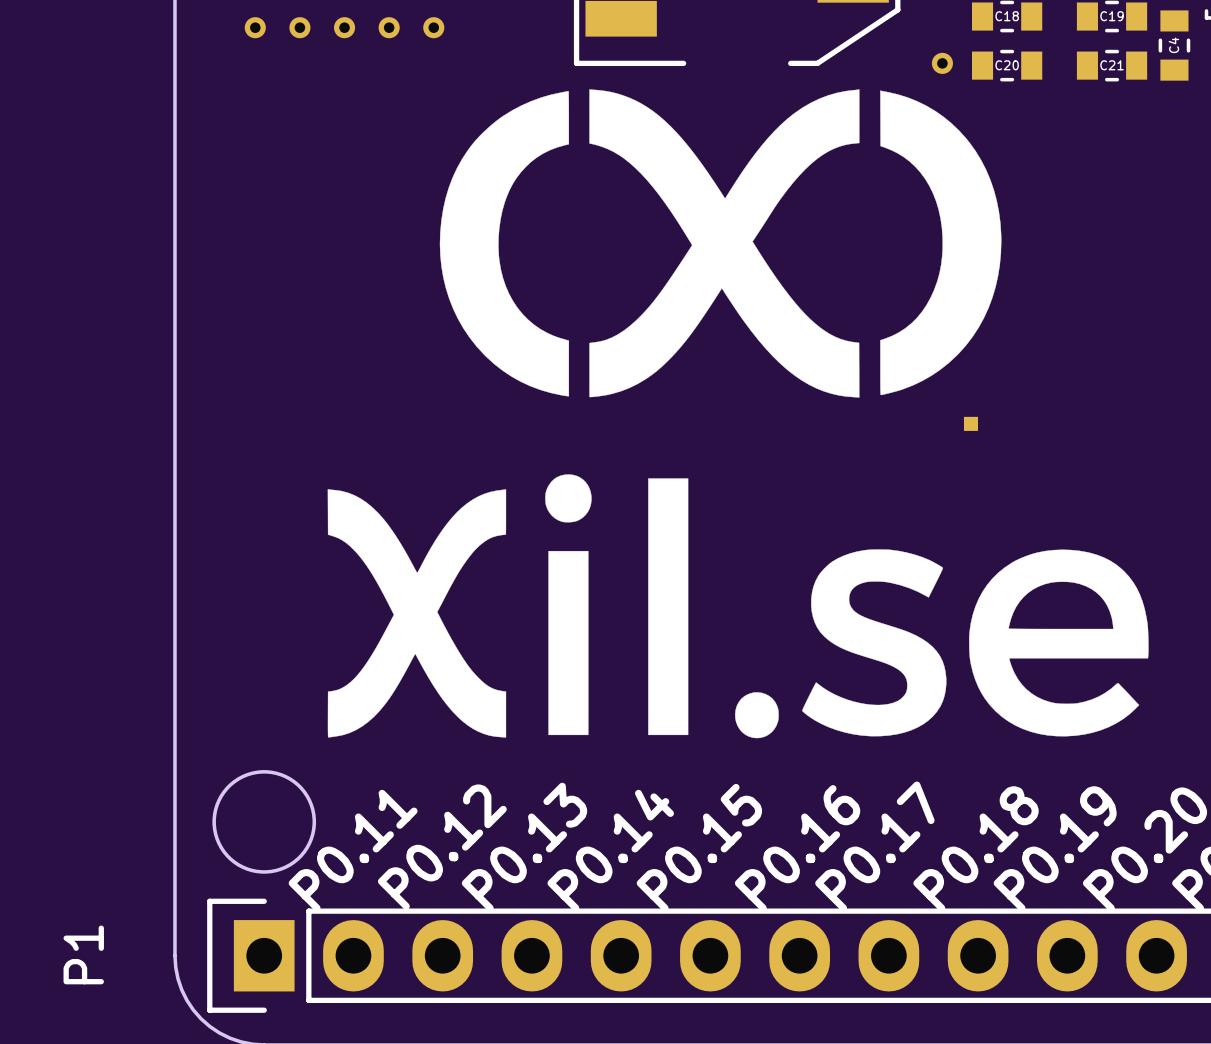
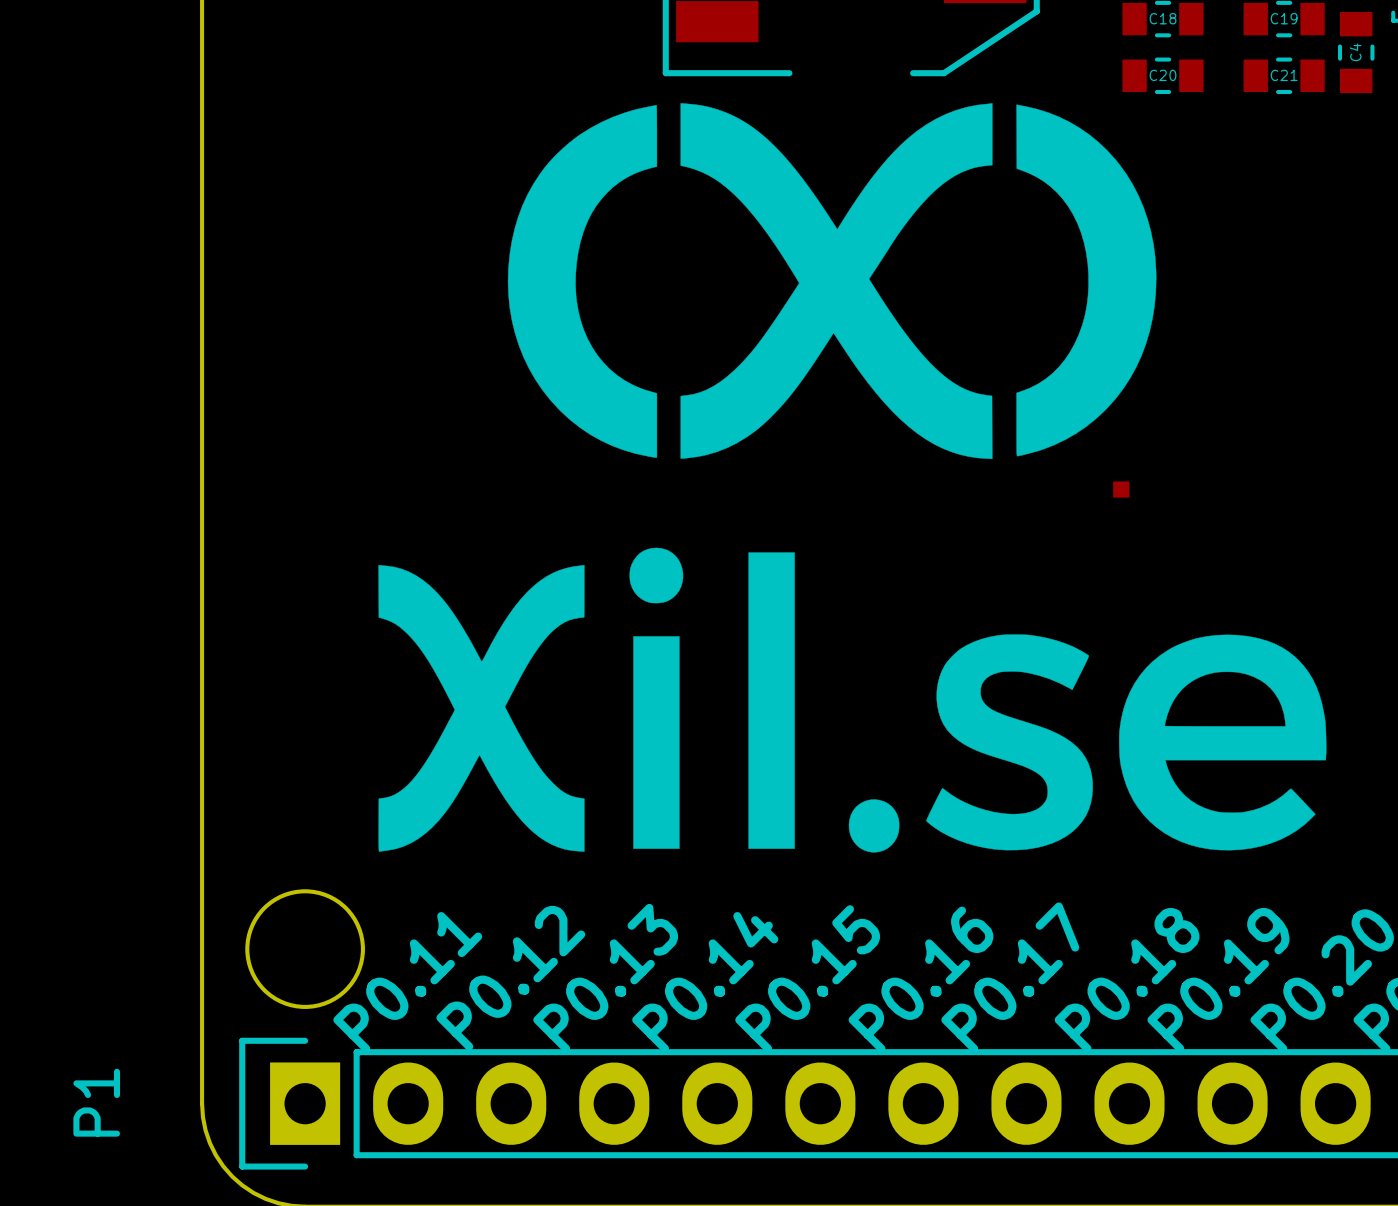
part: (255, 27) -> none
part: (299, 27) -> none
part: (344, 27) -> none
part: (389, 27) -> none
part: (433, 27) -> none
part: (942, 63) -> none

